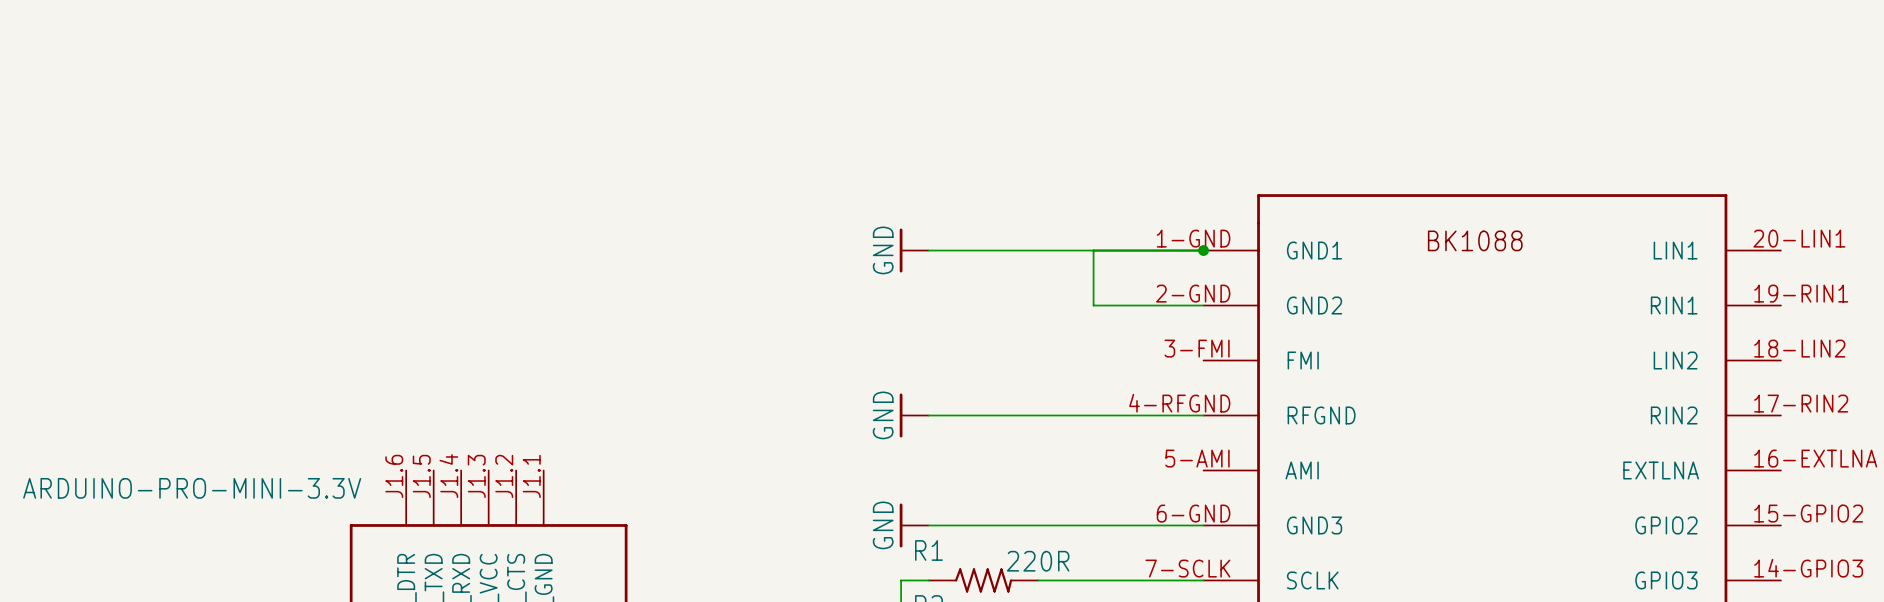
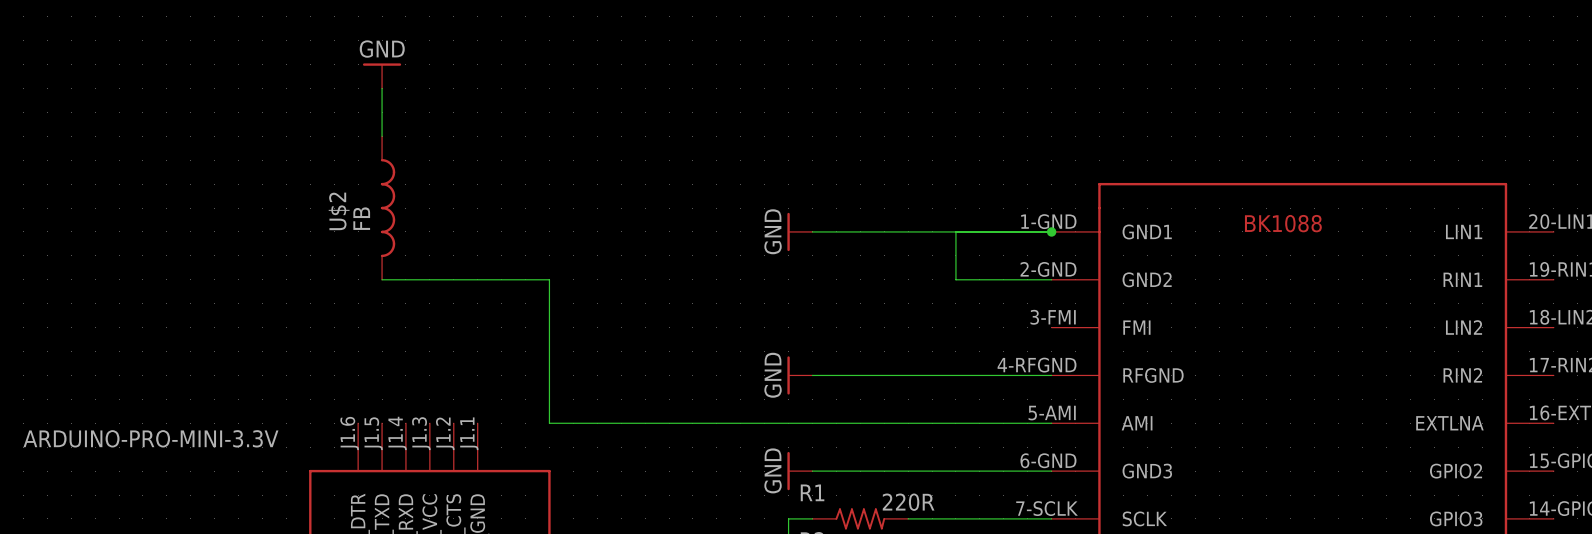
power symbol: none -> GND (382, 75)
wire: none -> (382, 88) (382, 136)
U$2: none -> FB (388, 208)
wire: none -> (382, 279) (549, 279) (549, 423) (1051, 423)

